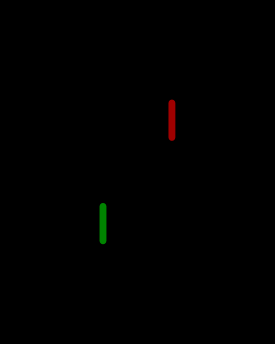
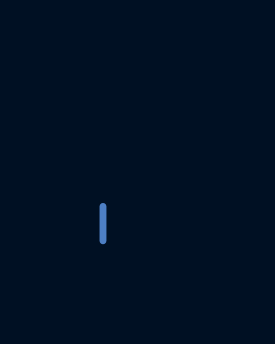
top track: (171, 102) (171, 137) -> none

